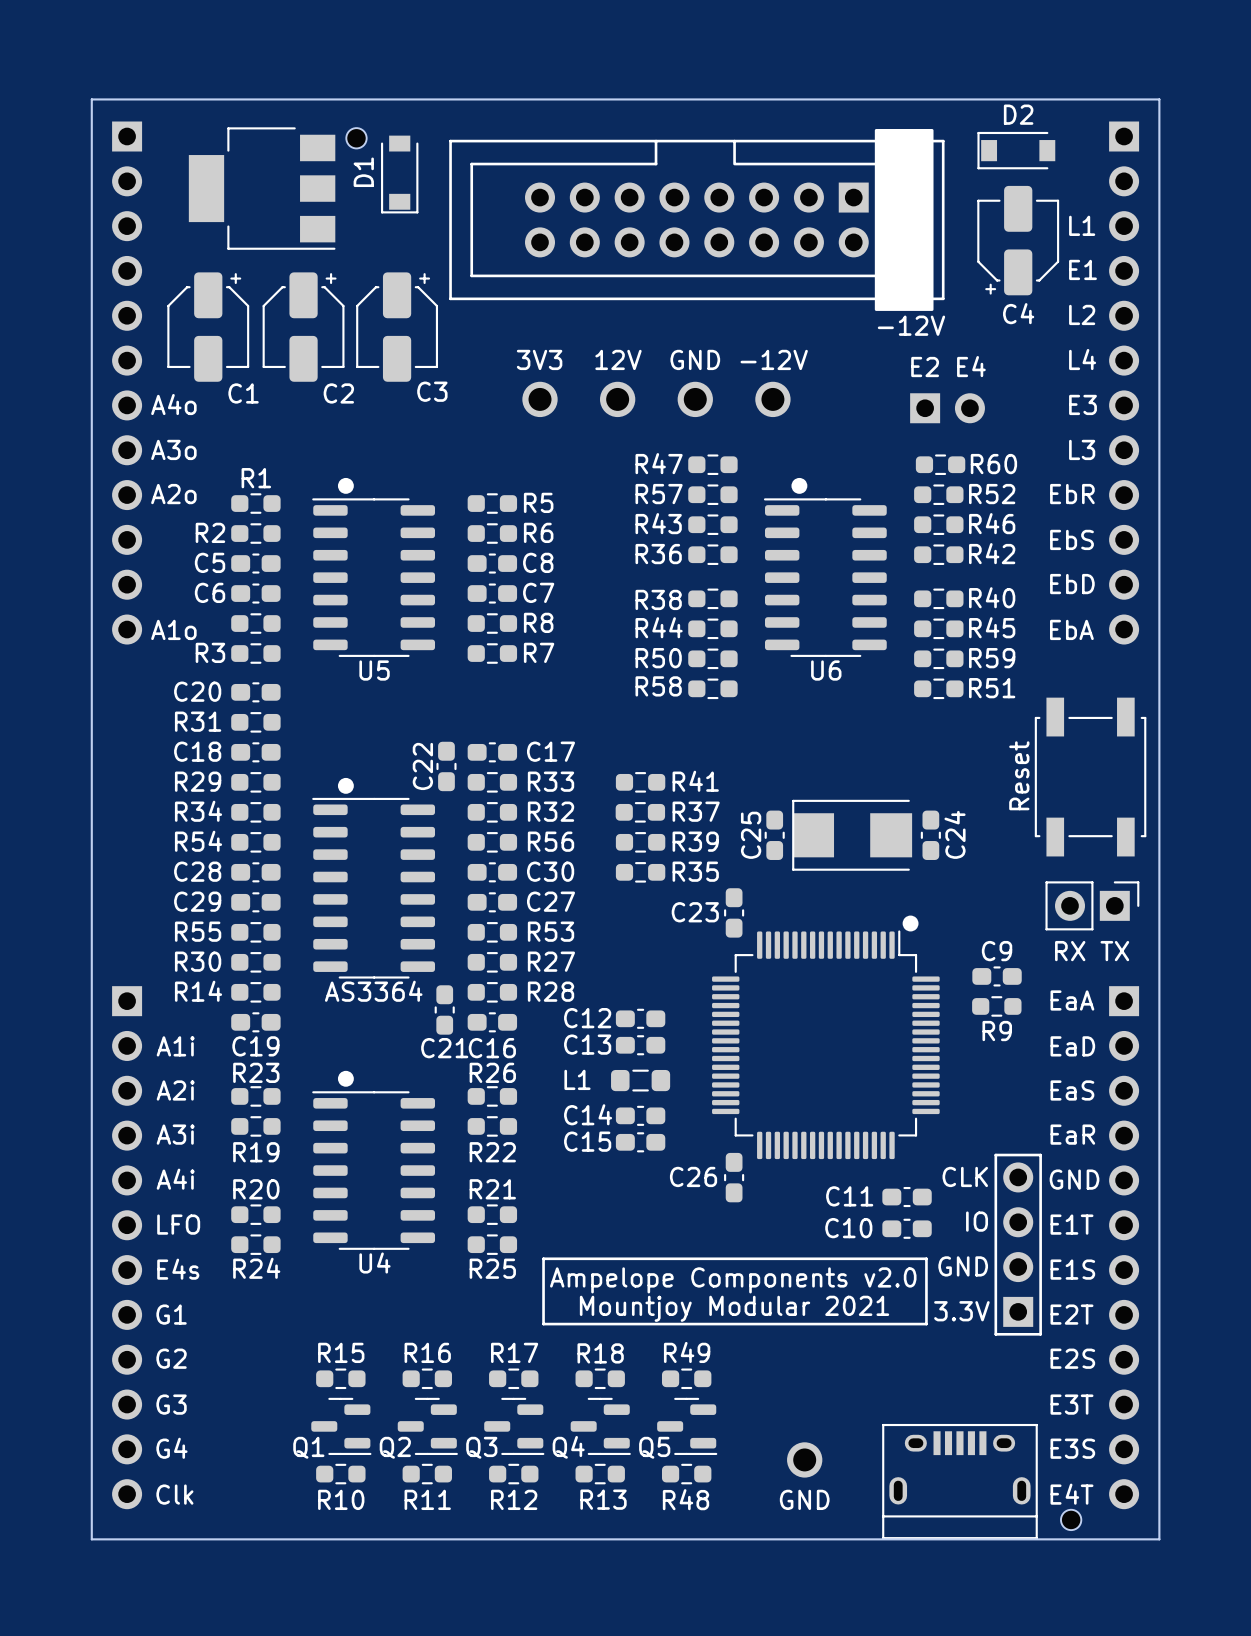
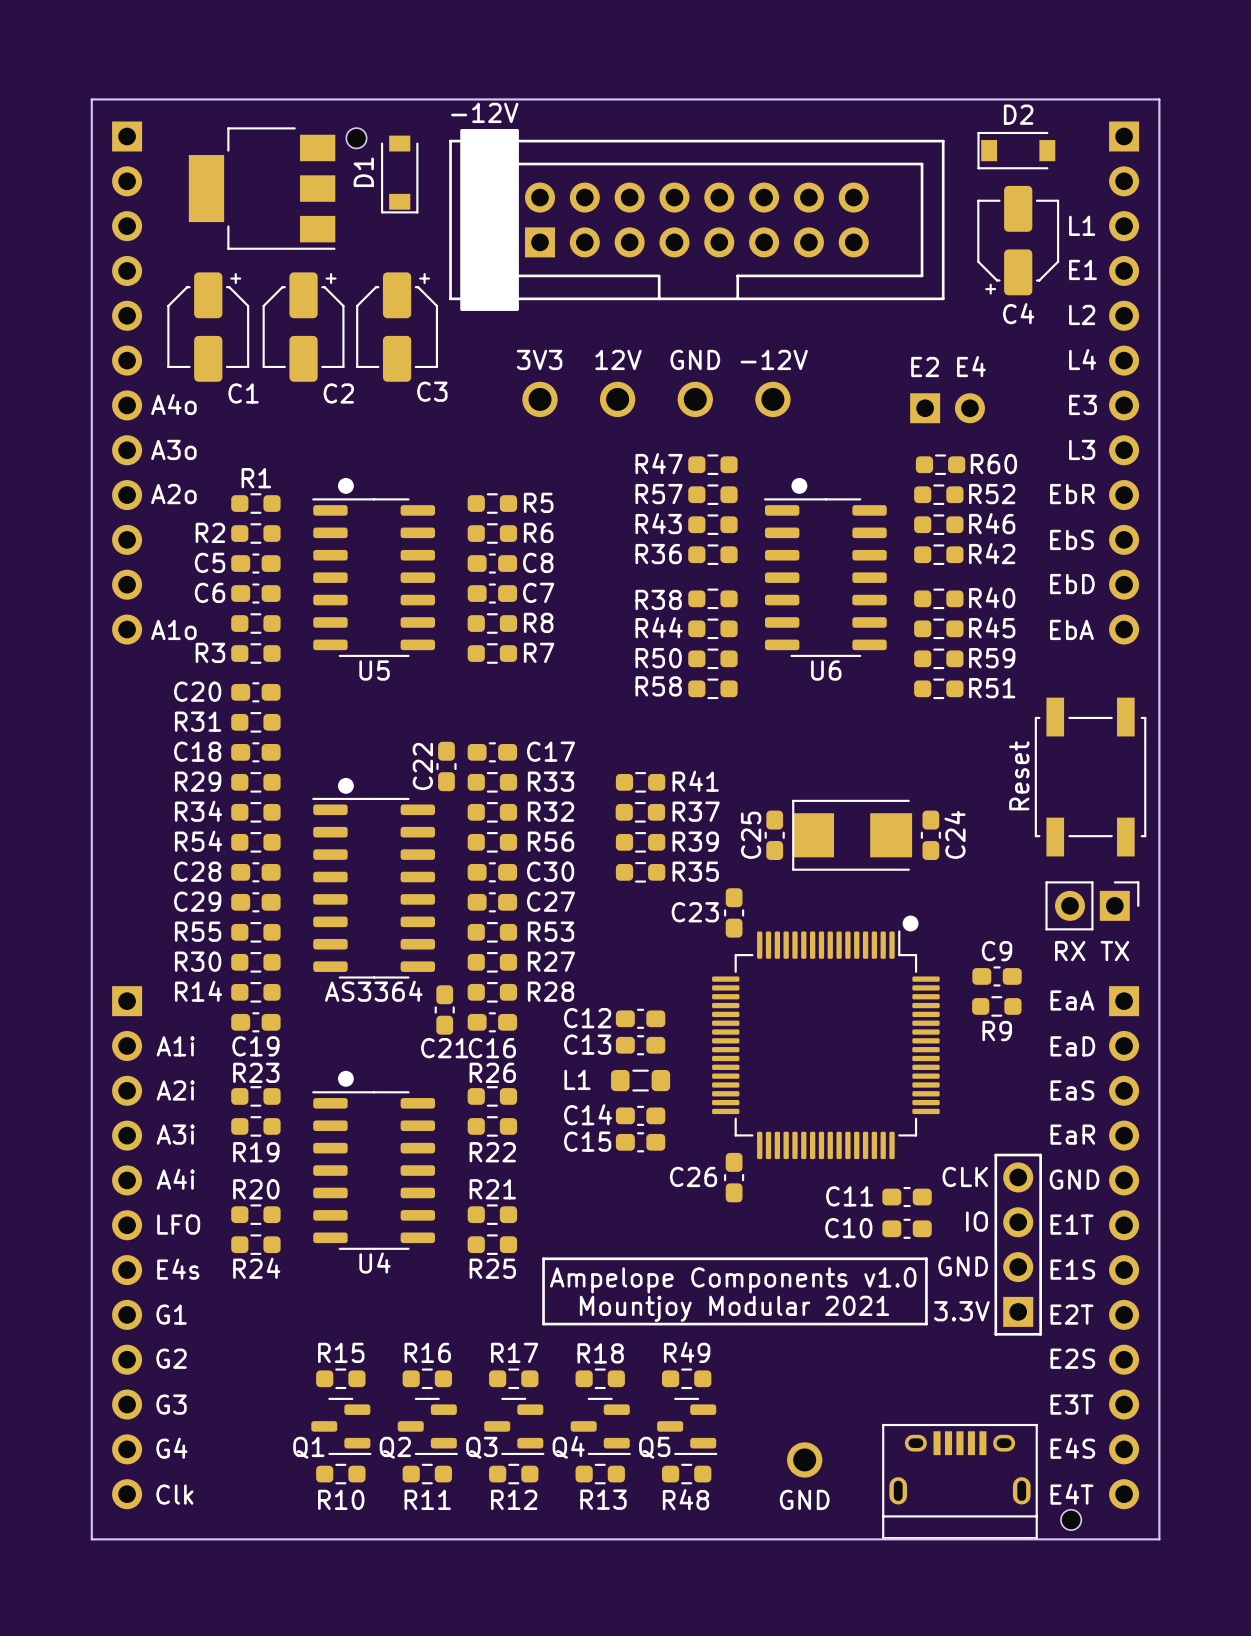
part rotation: 0° (696, 219) -> 180° (696, 219)
text: Ampelope Components v2.0 (733, 1280) -> Ampelope Components v1.0 (733, 1280)
text: E3S (1072, 1448) -> E4S (1072, 1448)

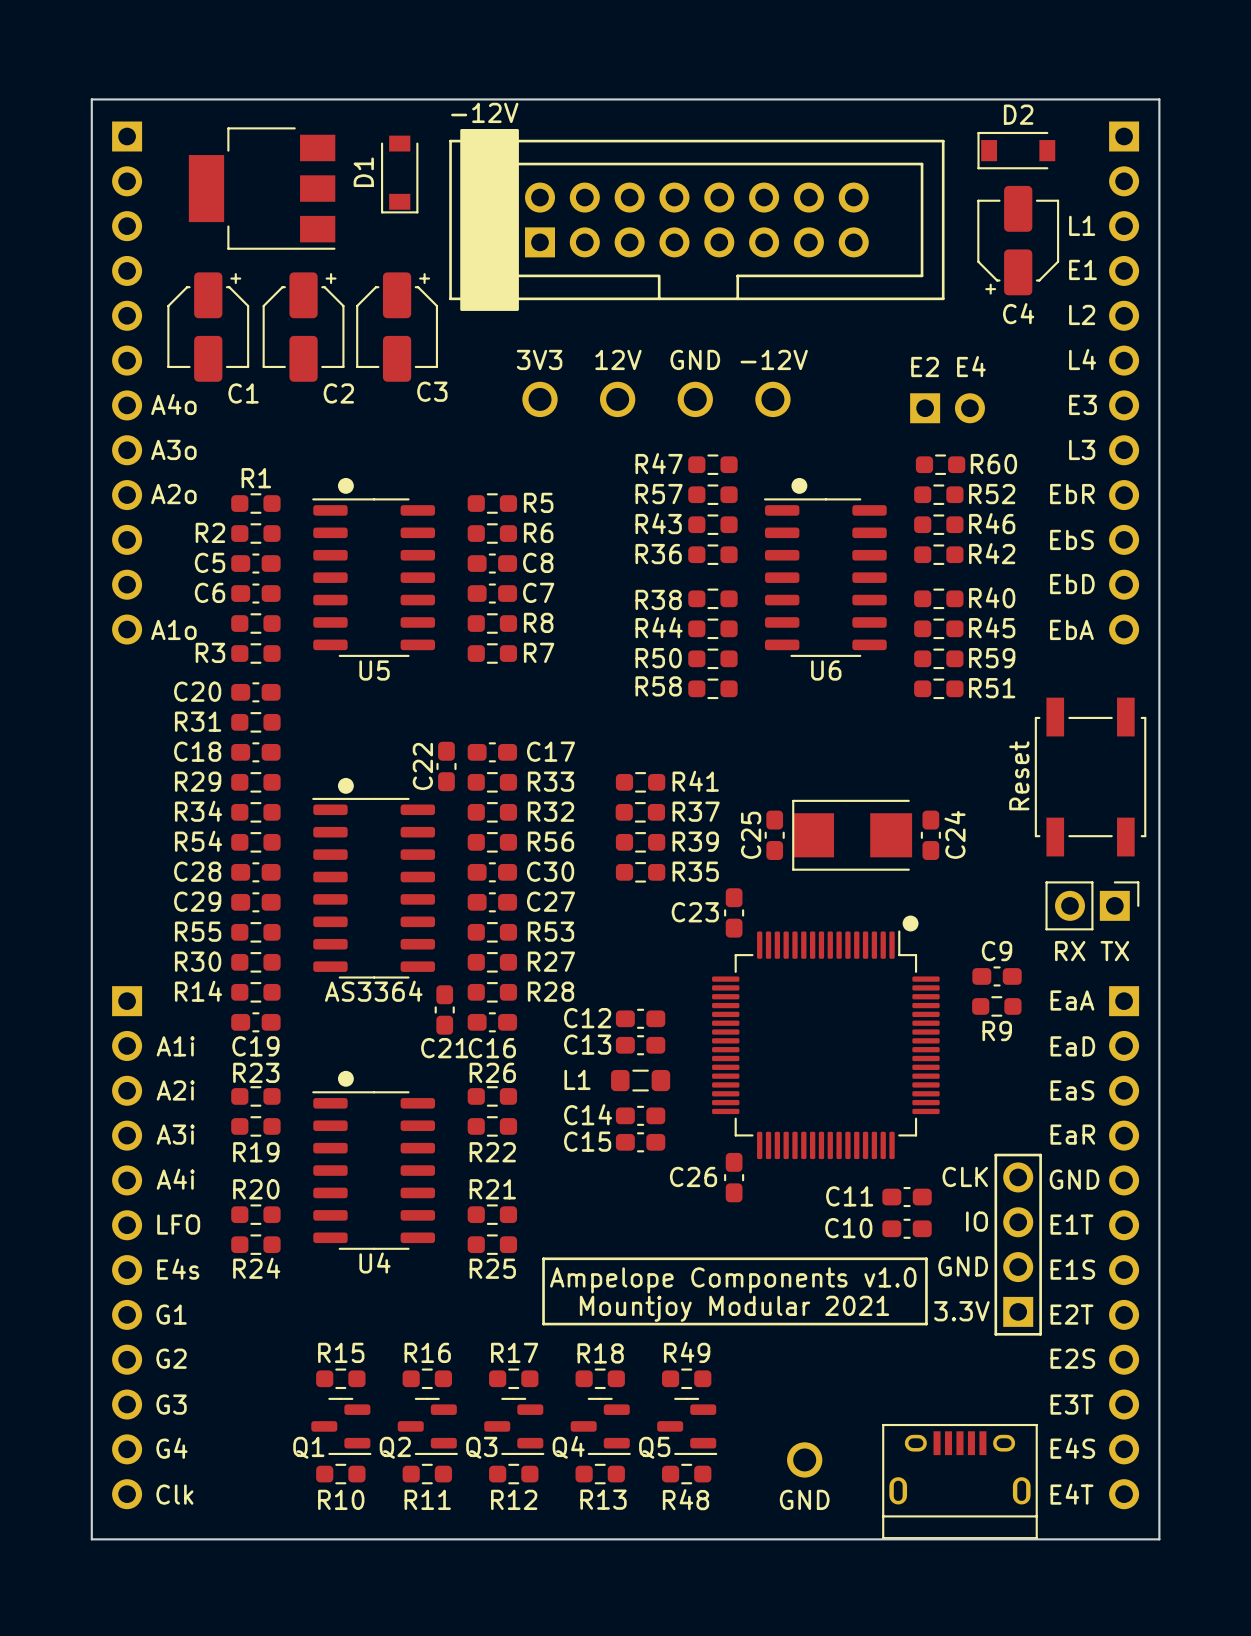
part: (356, 138) -> none
part: (1071, 1519) -> none

